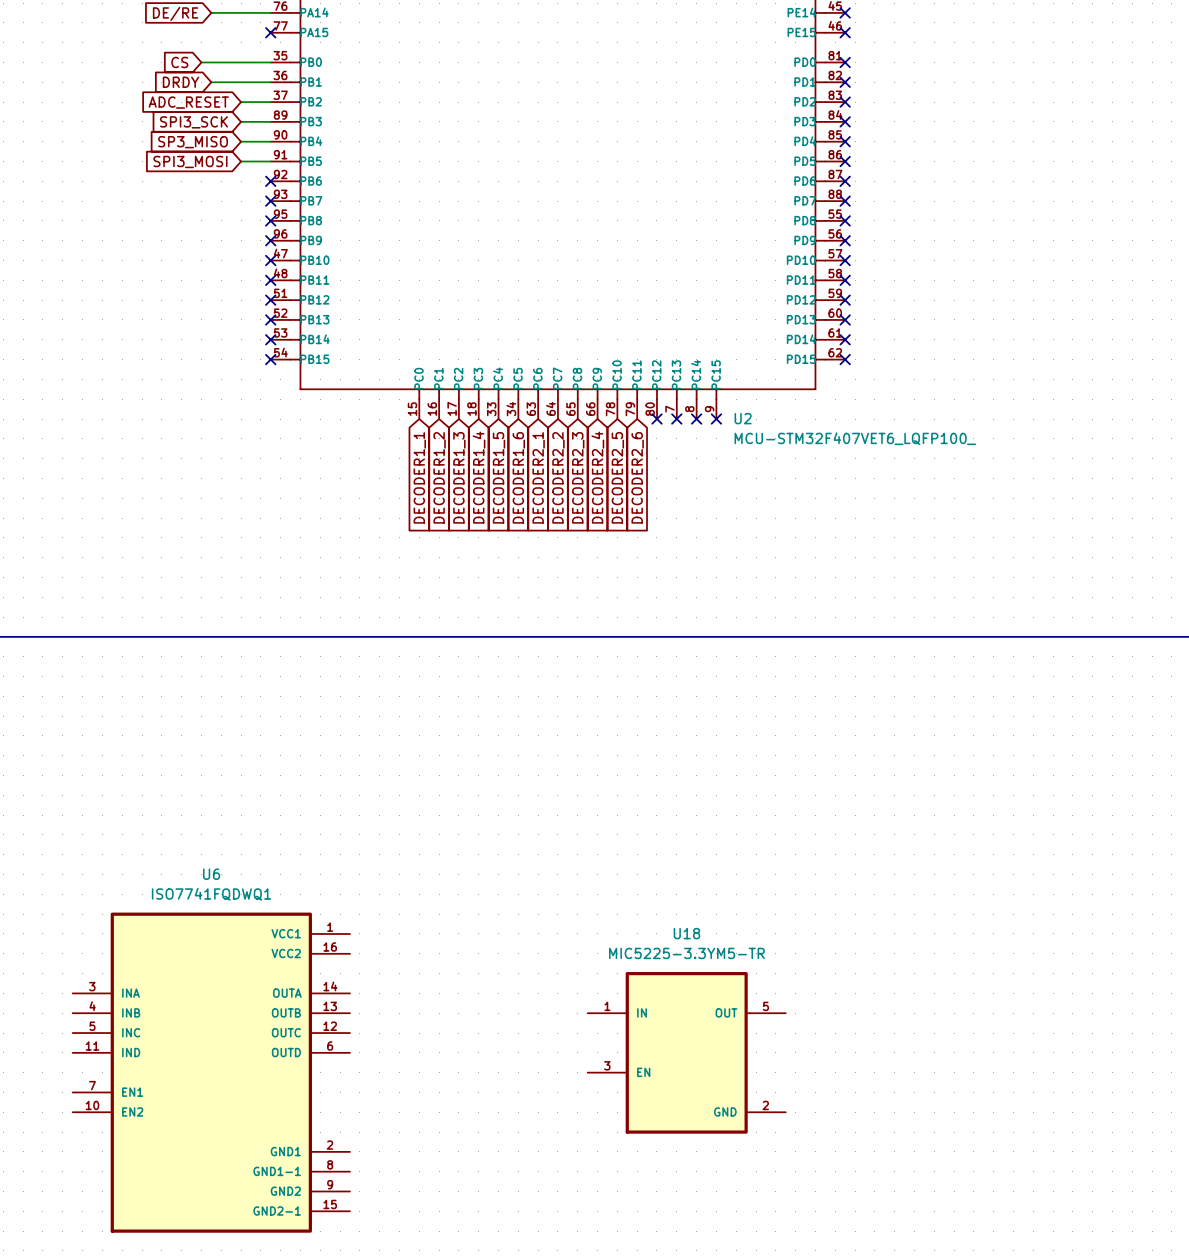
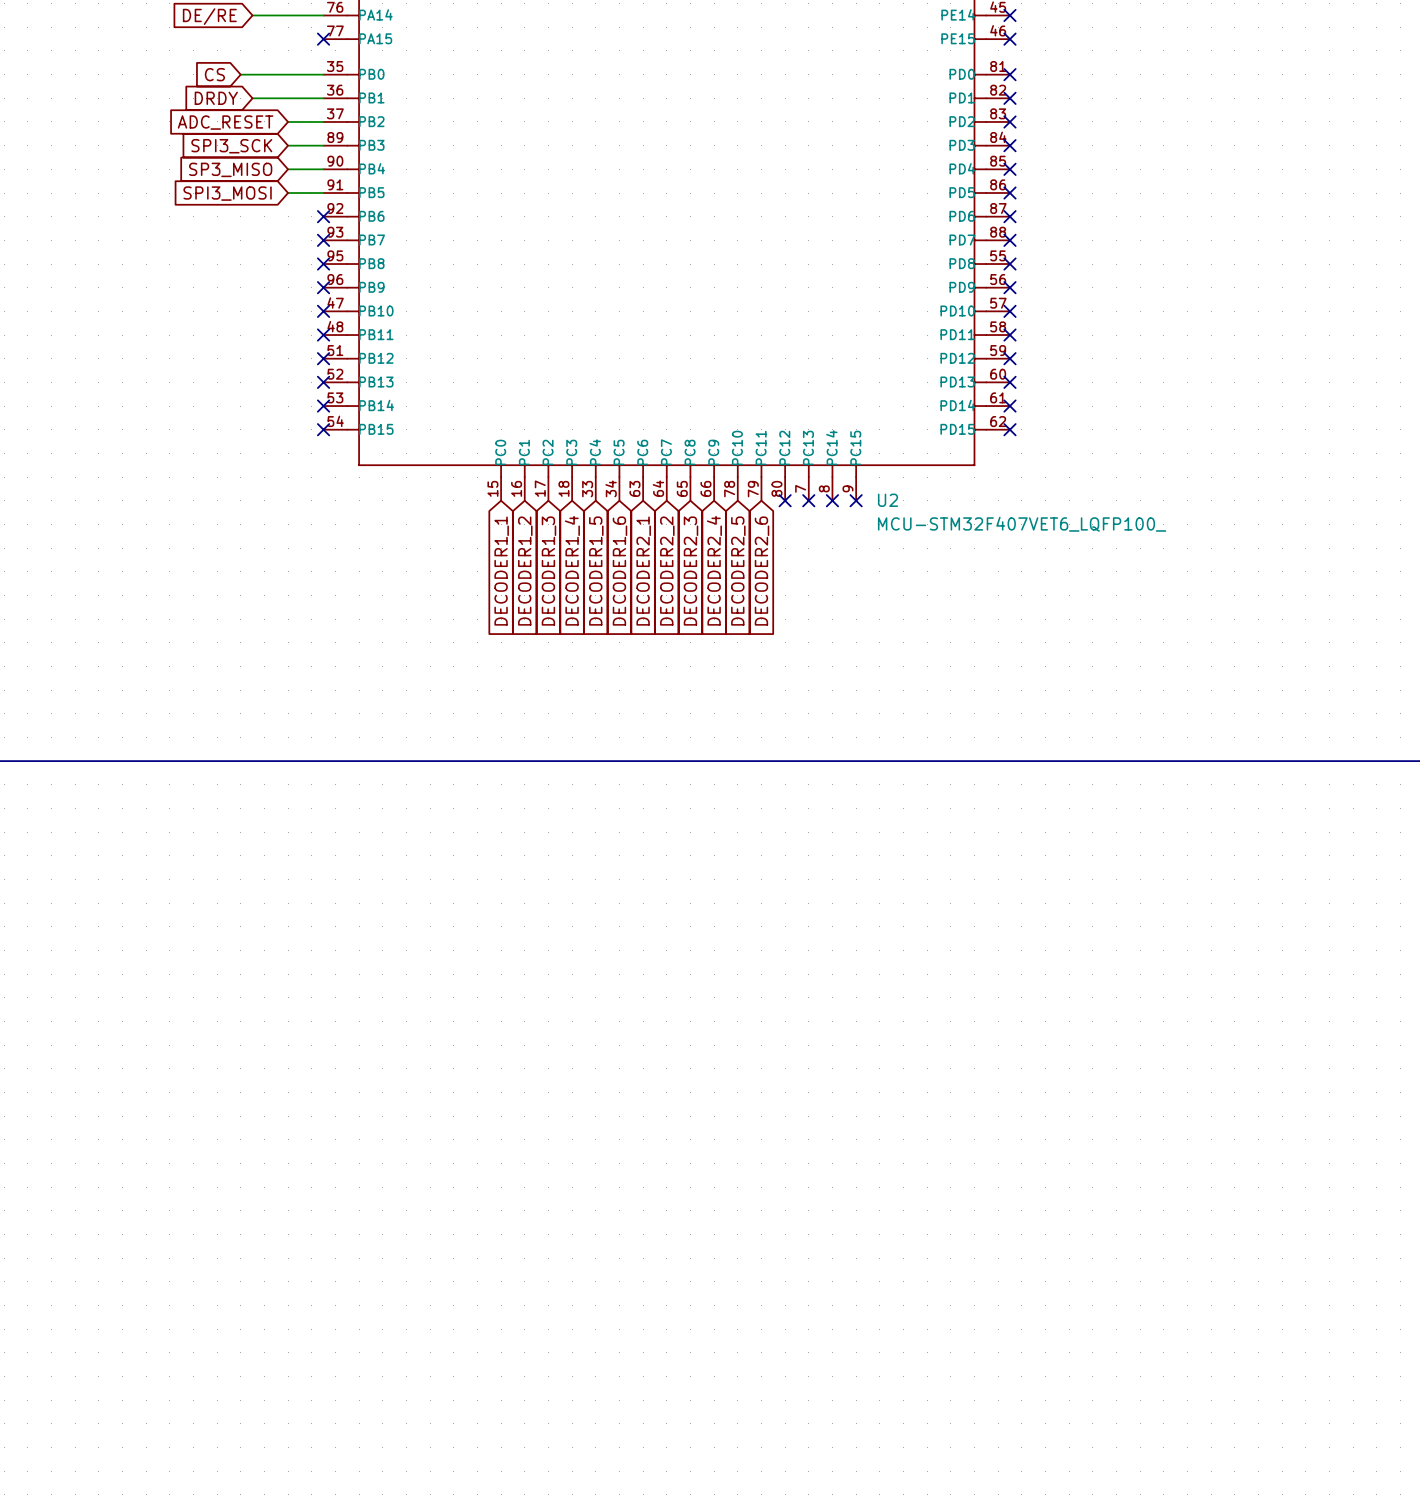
U18: MIC5225-3.3YM5-TR (686, 1052) -> none
U6: ISO7741FQDWQ1 (211, 1072) -> none

